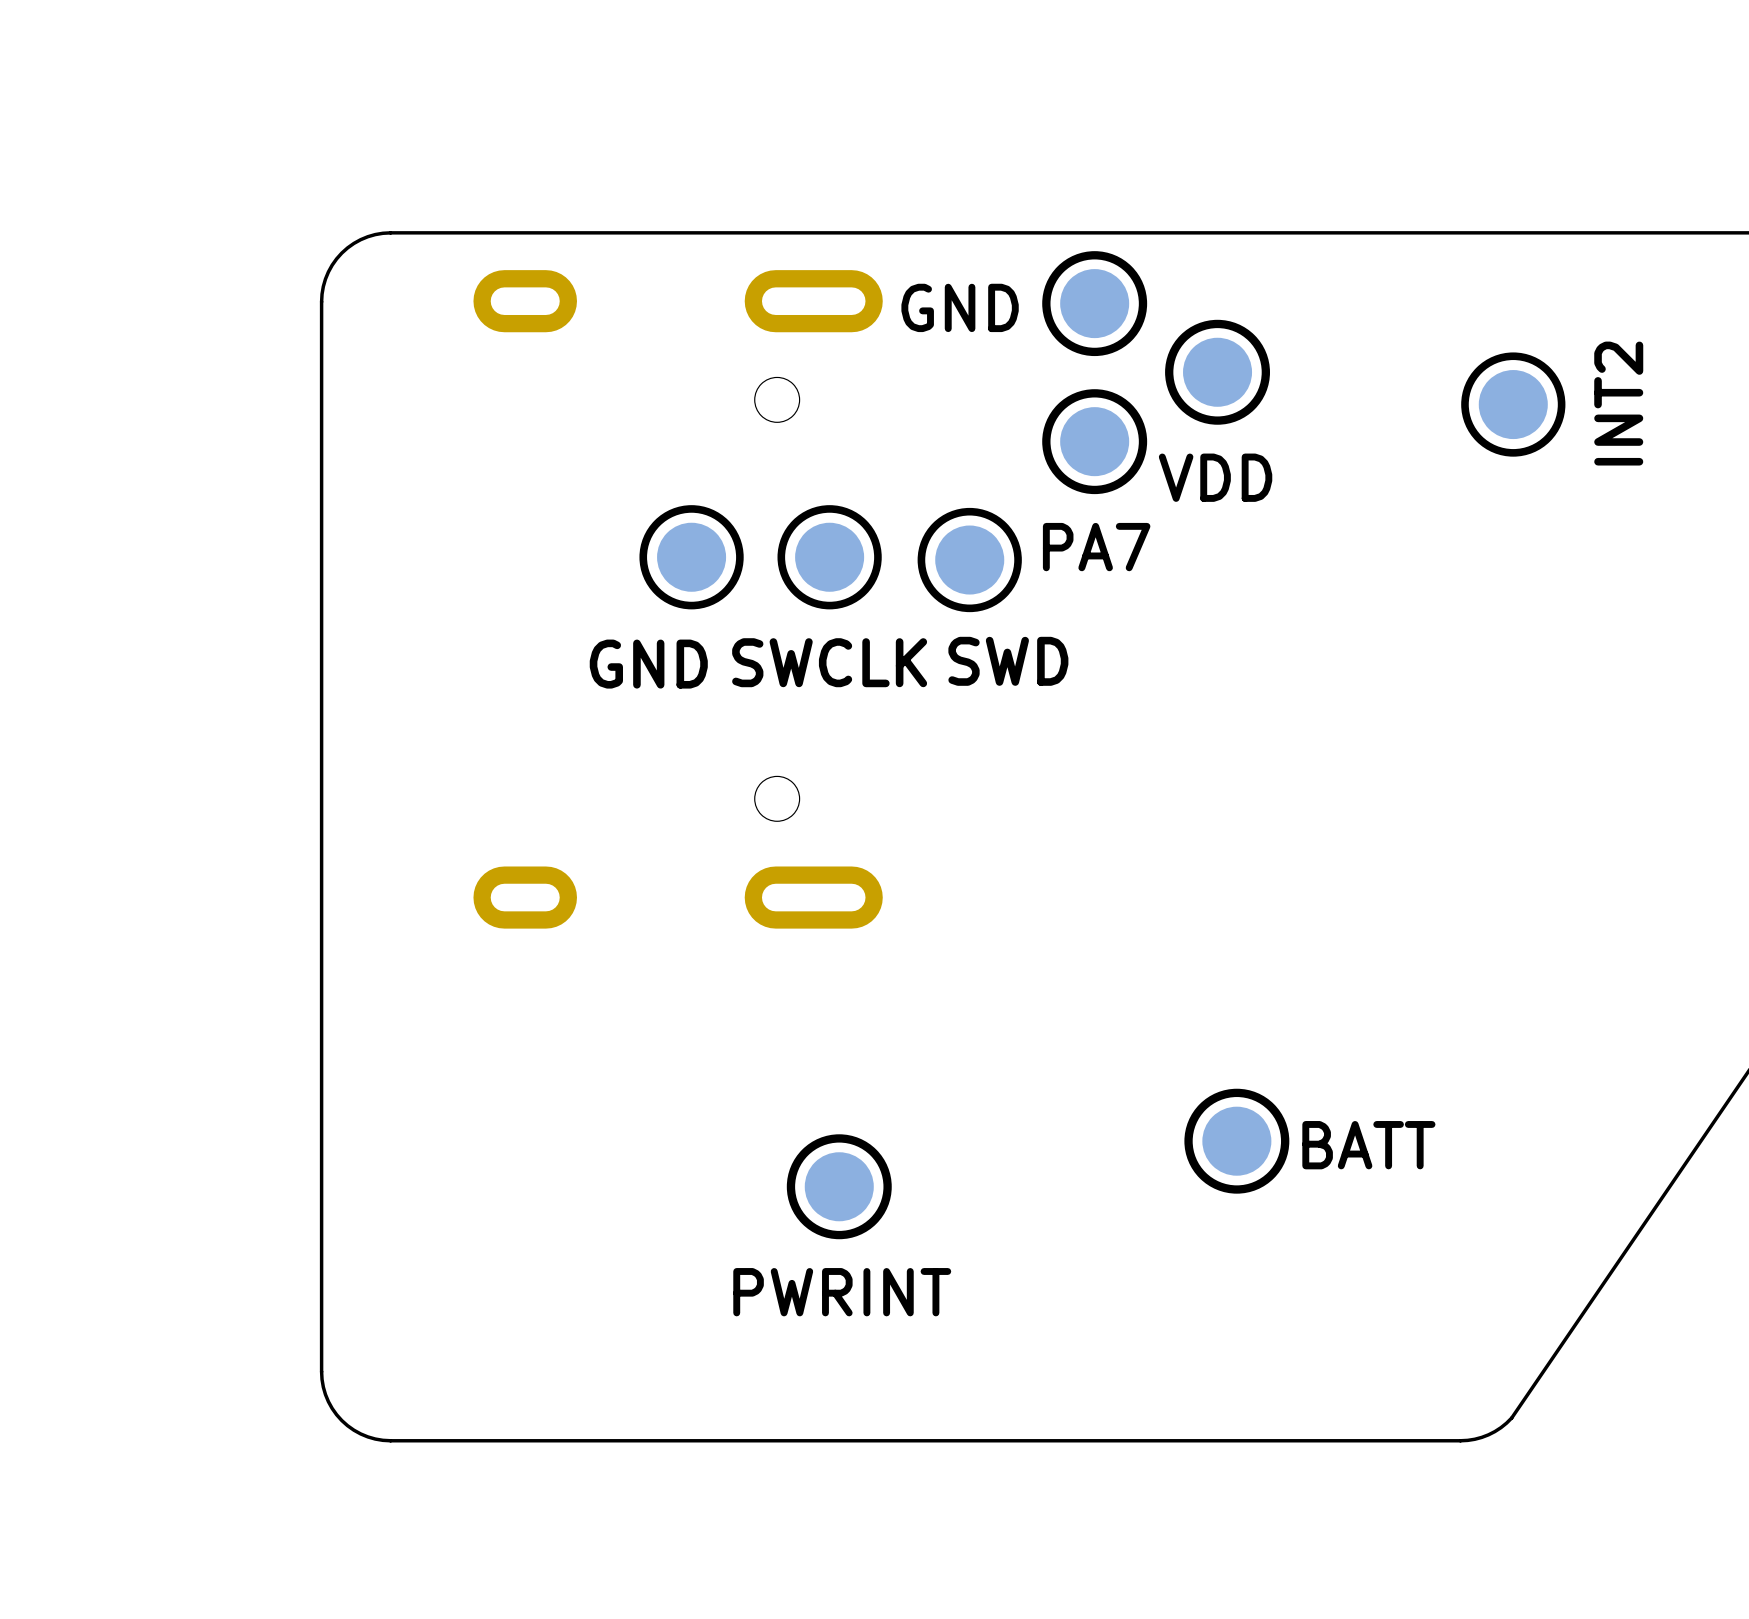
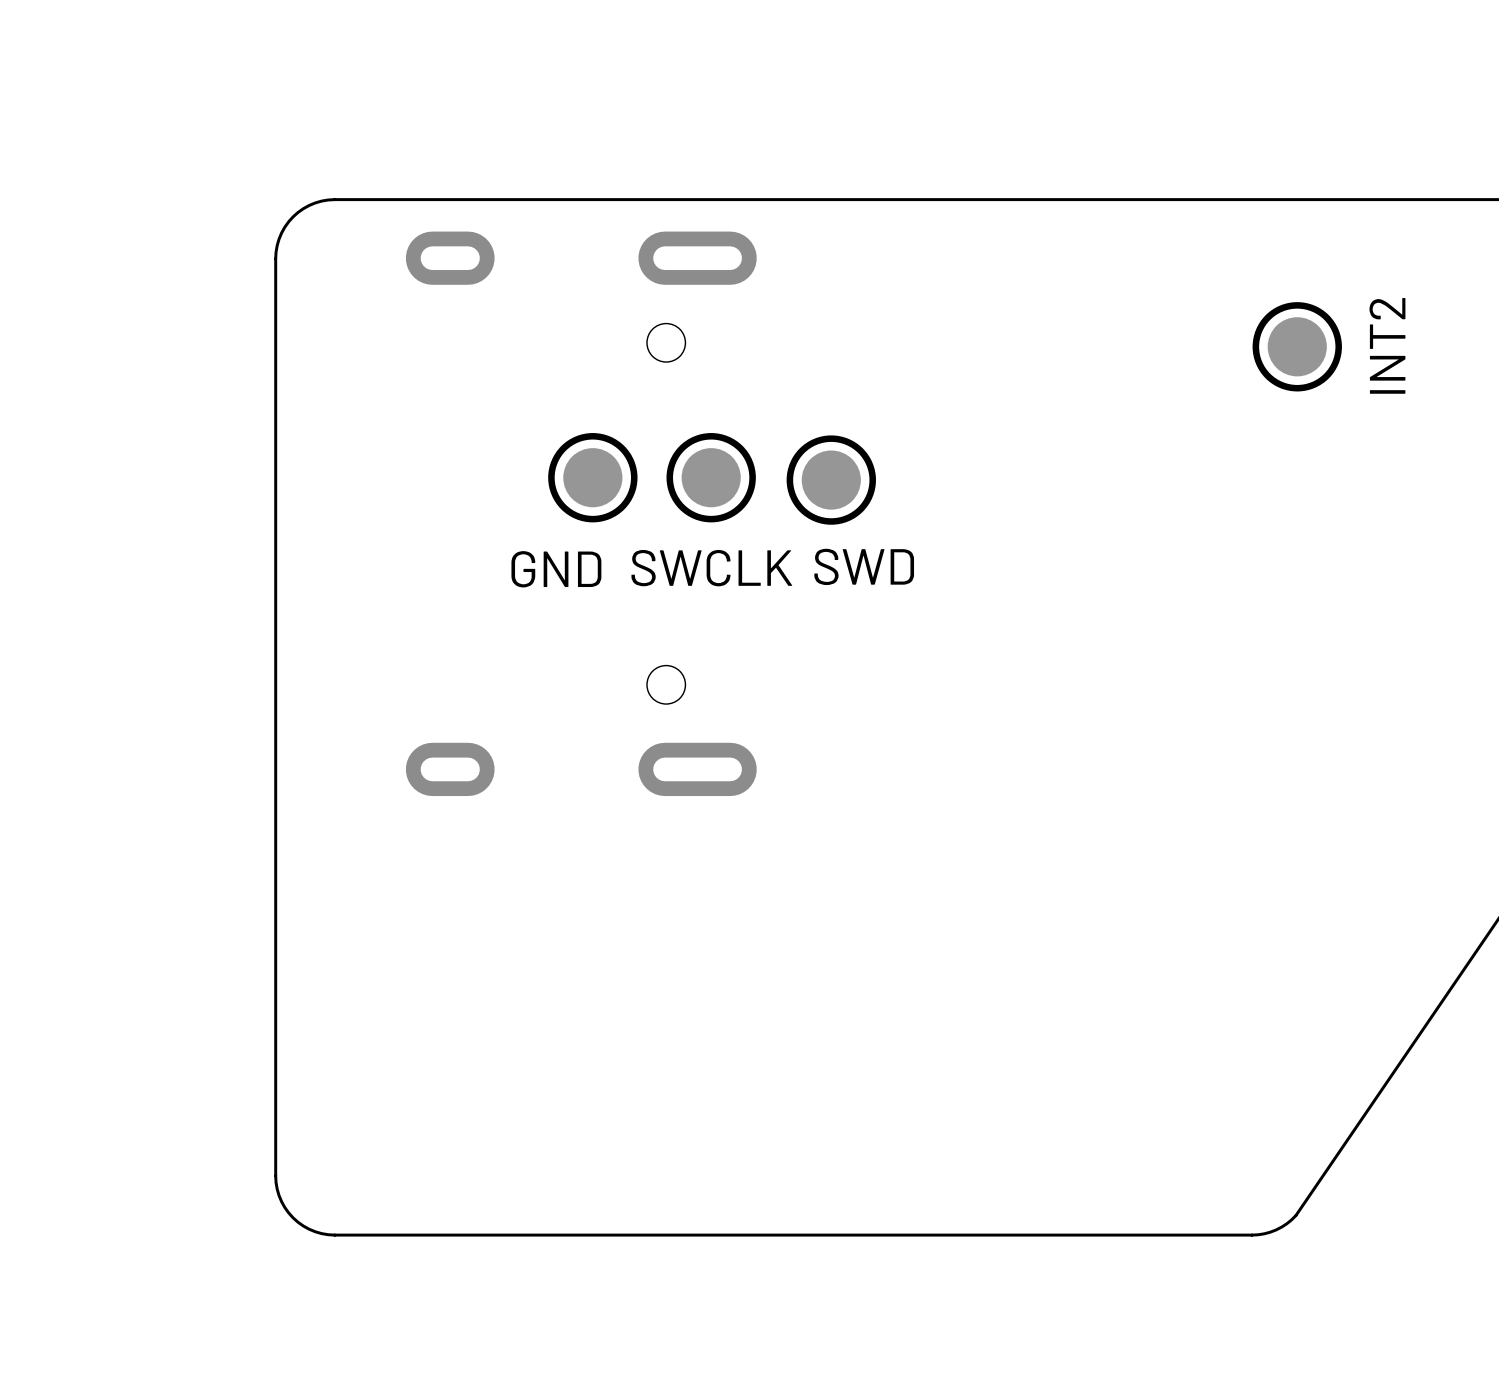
part: GND (1094, 303) -> none
part: VDD (1217, 372) -> none
part: PA7 (1094, 441) -> none
part: BATT (1236, 1141) -> none
part: PWRINT (839, 1186) -> none

